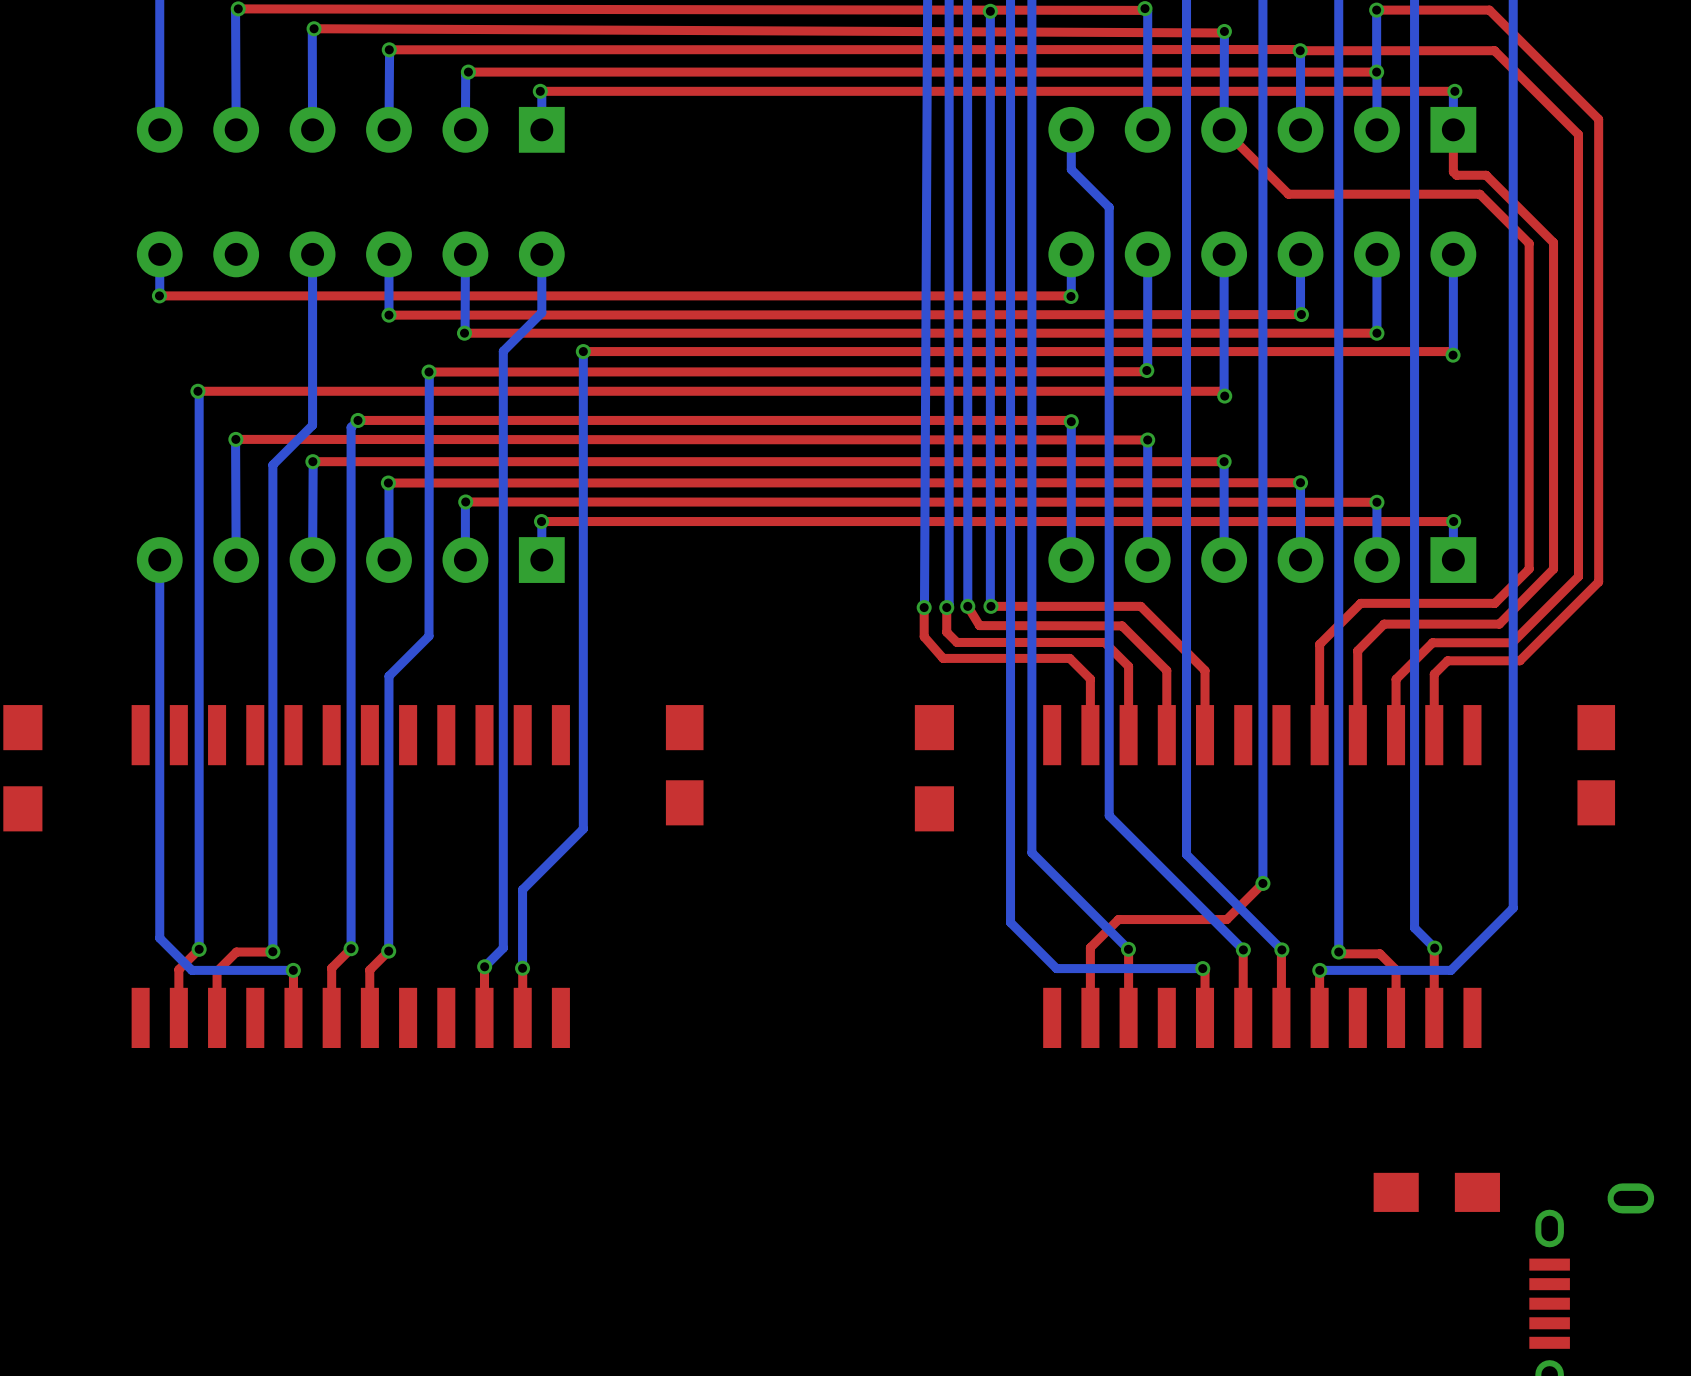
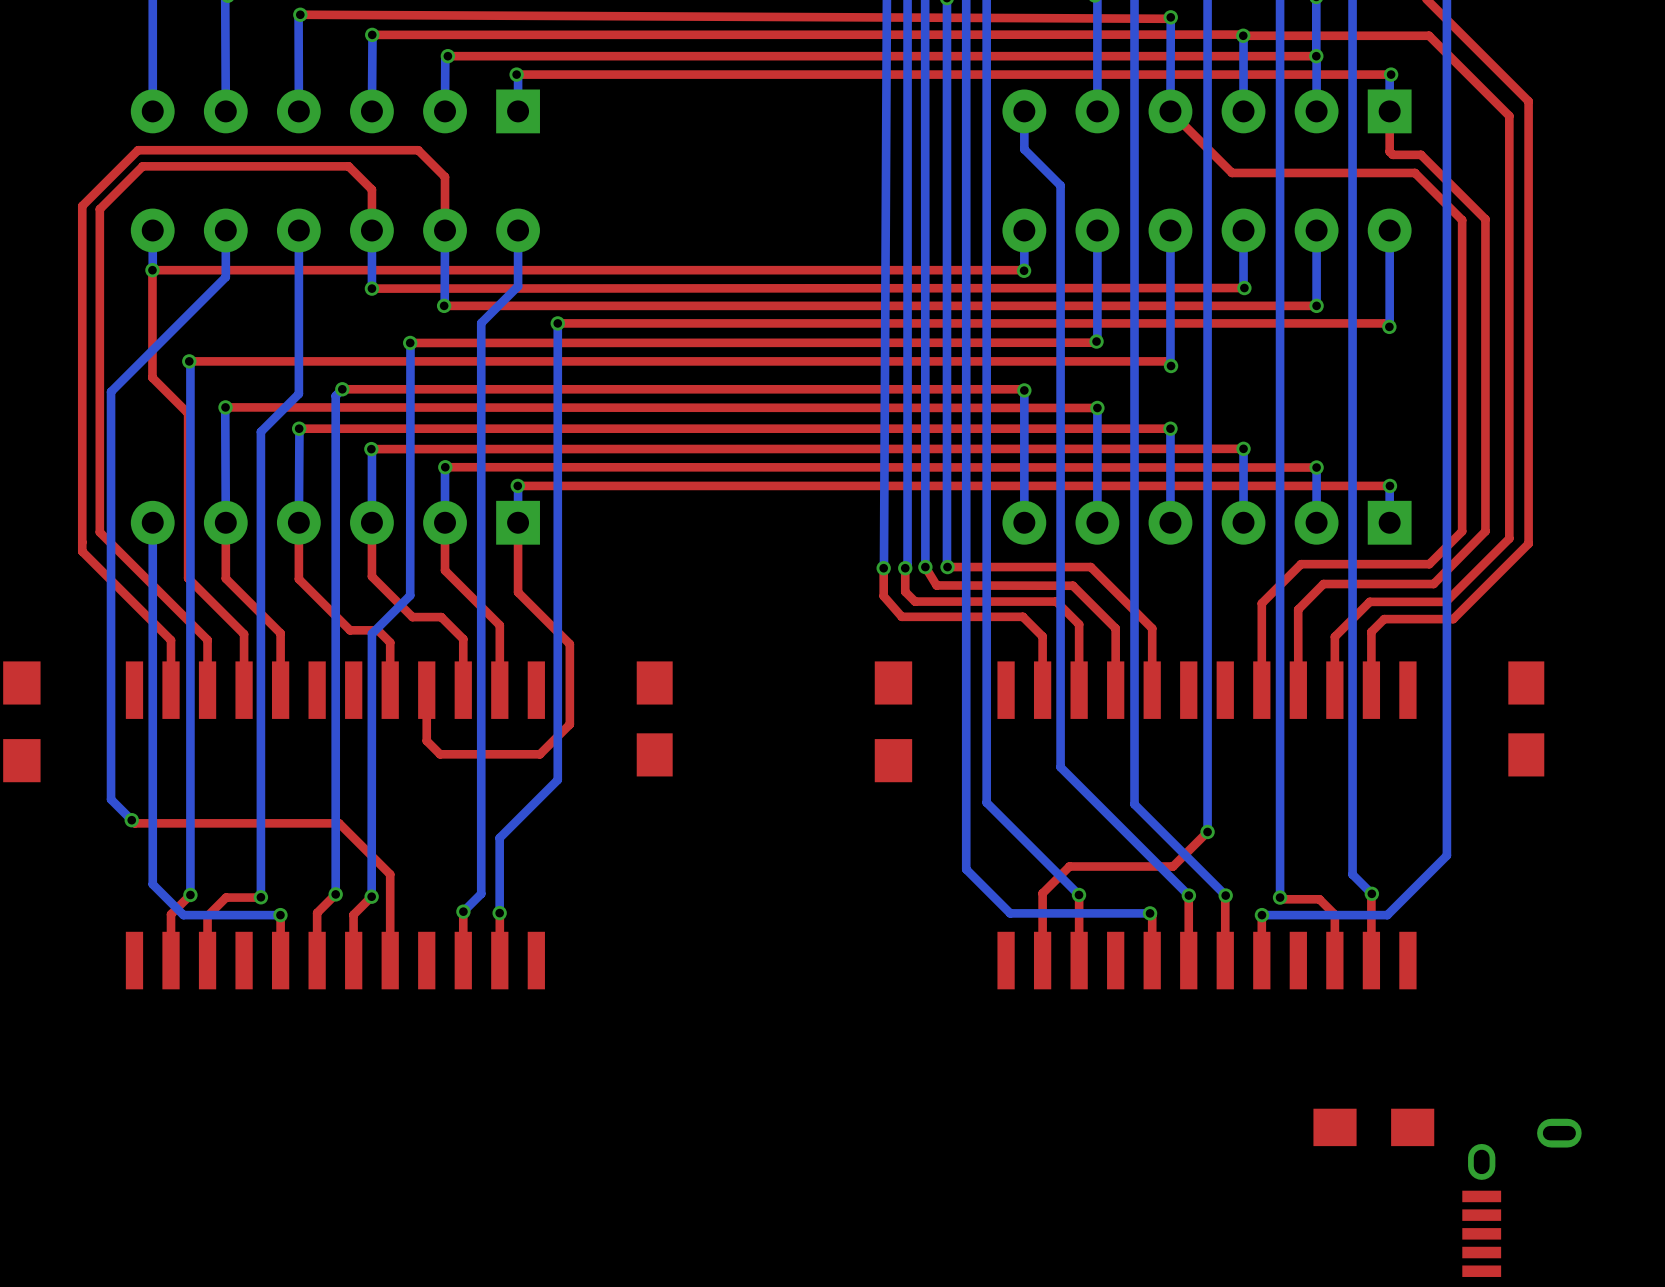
bottom track: none -> (225, 230) (225, 277) (111, 391) (111, 799) (131, 820)
top track: none -> (371, 230) (371, 189) (348, 166) (142, 166) (99, 209) (99, 532) (207, 639) (207, 690)
top track: none -> (445, 230) (445, 176) (418, 150) (138, 150) (82, 206) (82, 551) (171, 640) (171, 690)
top track: none -> (152, 270) (152, 377) (188, 413) (188, 578) (244, 634) (244, 690)
top track: none -> (225, 522) (225, 578) (280, 633) (280, 690)
top track: none -> (298, 522) (298, 579) (350, 630) (377, 630) (390, 642) (390, 690)
top track: none -> (371, 522) (371, 576) (412, 617) (441, 617) (463, 639) (463, 690)
top track: none -> (445, 522) (445, 570) (499, 625) (499, 690)
top track: none -> (518, 522) (518, 592) (569, 644) (569, 724) (539, 754) (440, 754) (426, 740) (426, 690)
top track: none -> (131, 820) (134, 823) (339, 823) (390, 874) (390, 960)
via: none -> (131, 820)

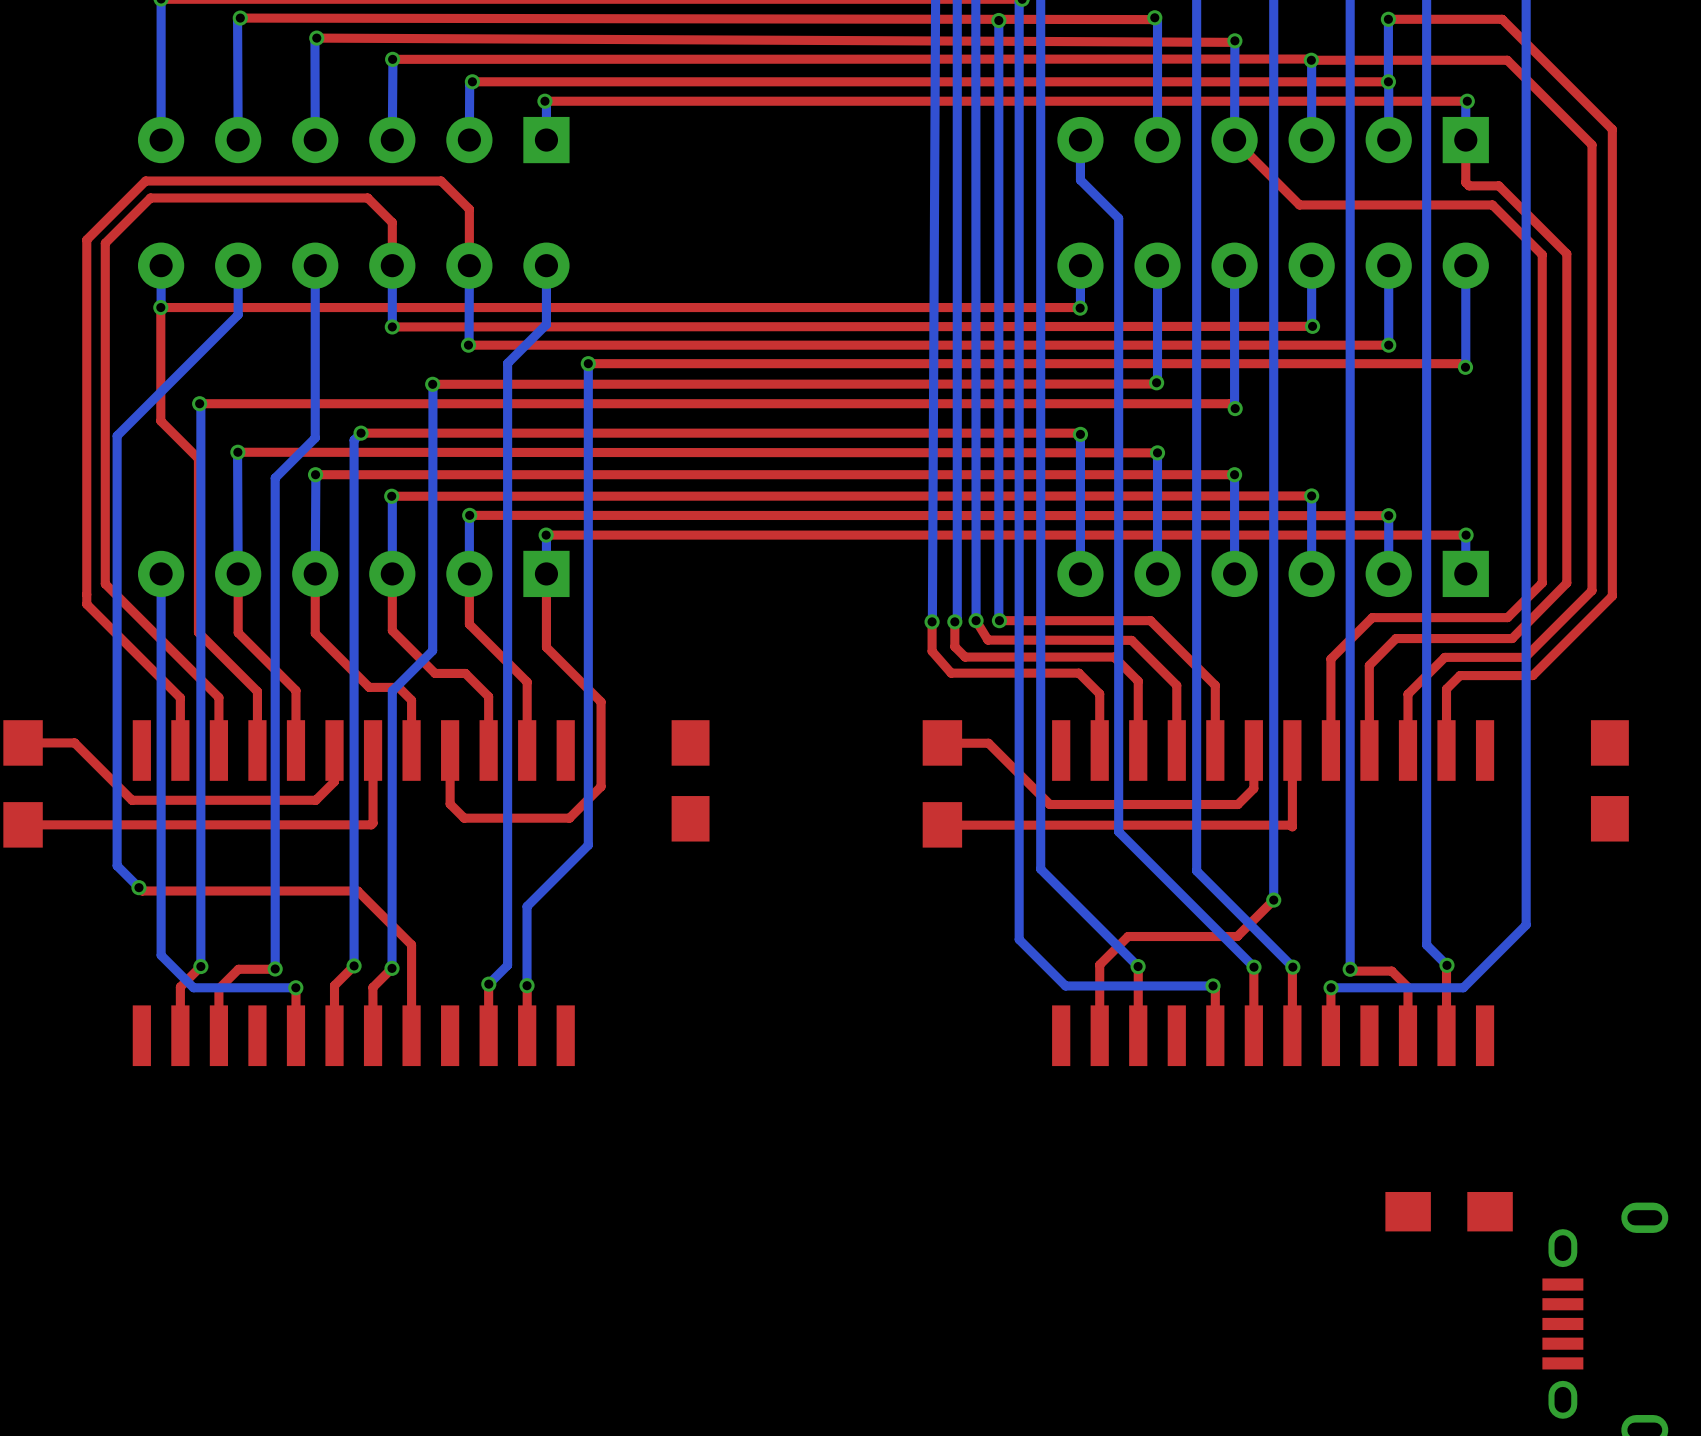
top track: none -> (23, 742) (74, 742) (131, 800) (315, 800) (334, 781) (334, 750)
top track: none -> (946, 743) (988, 743) (1049, 804) (1237, 804) (1253, 788) (1253, 750)
top track: none -> (373, 750) (373, 823) (371, 824) (23, 824)
top track: none -> (1292, 750) (1292, 826) (1290, 825) (946, 825)

